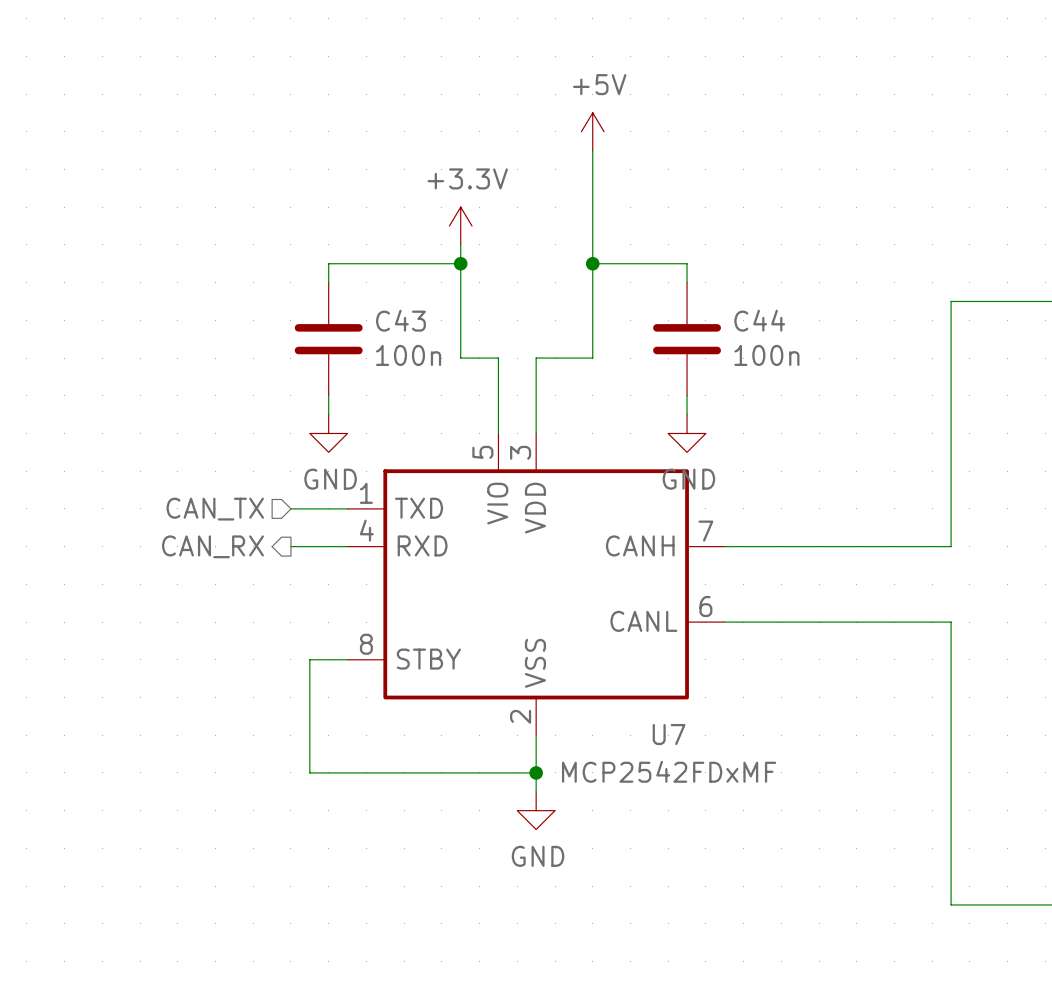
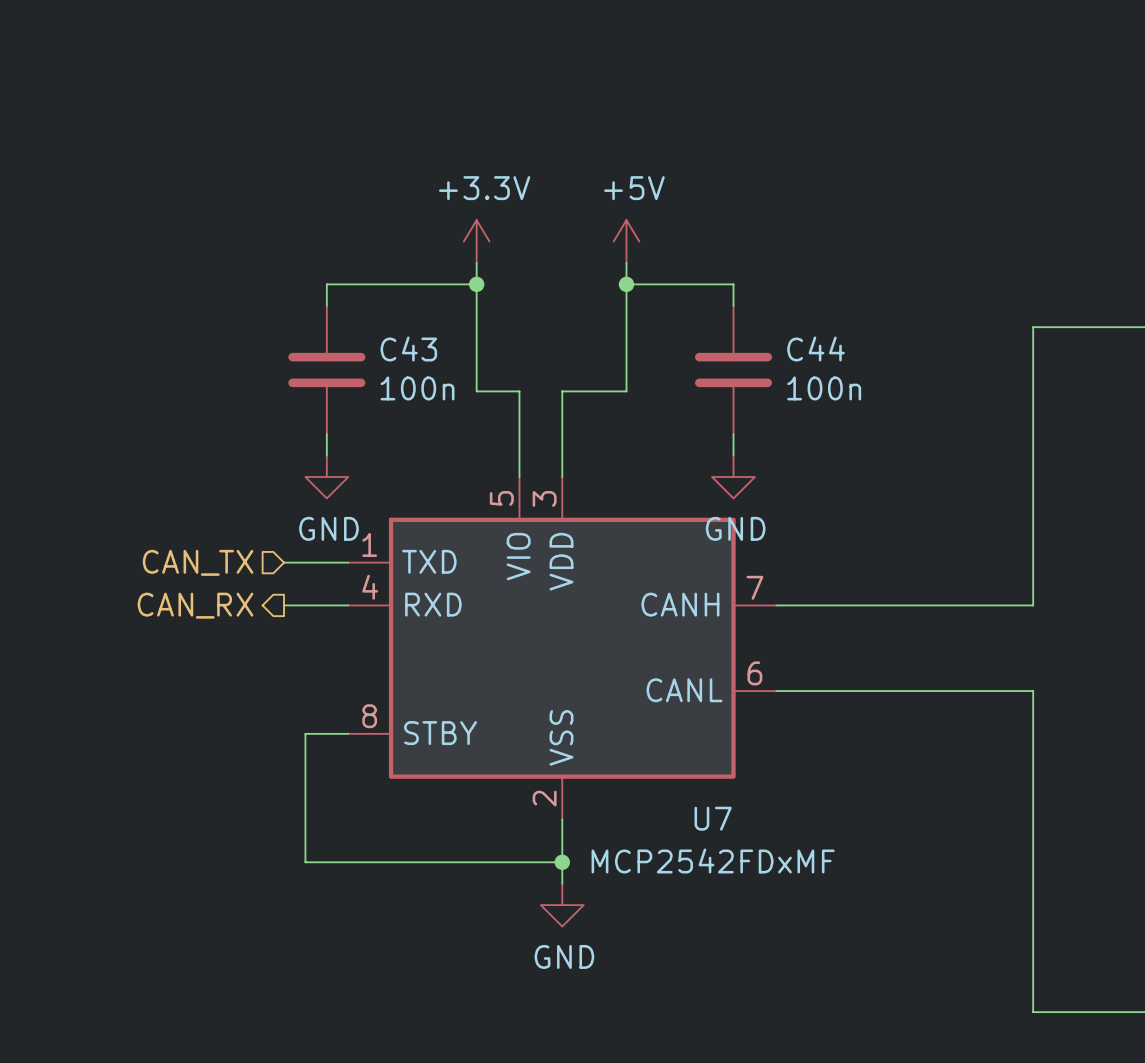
power symbol position: +5V (592, 131) -> +5V (626, 241)
wire: (592, 150) (592, 244) -> none

